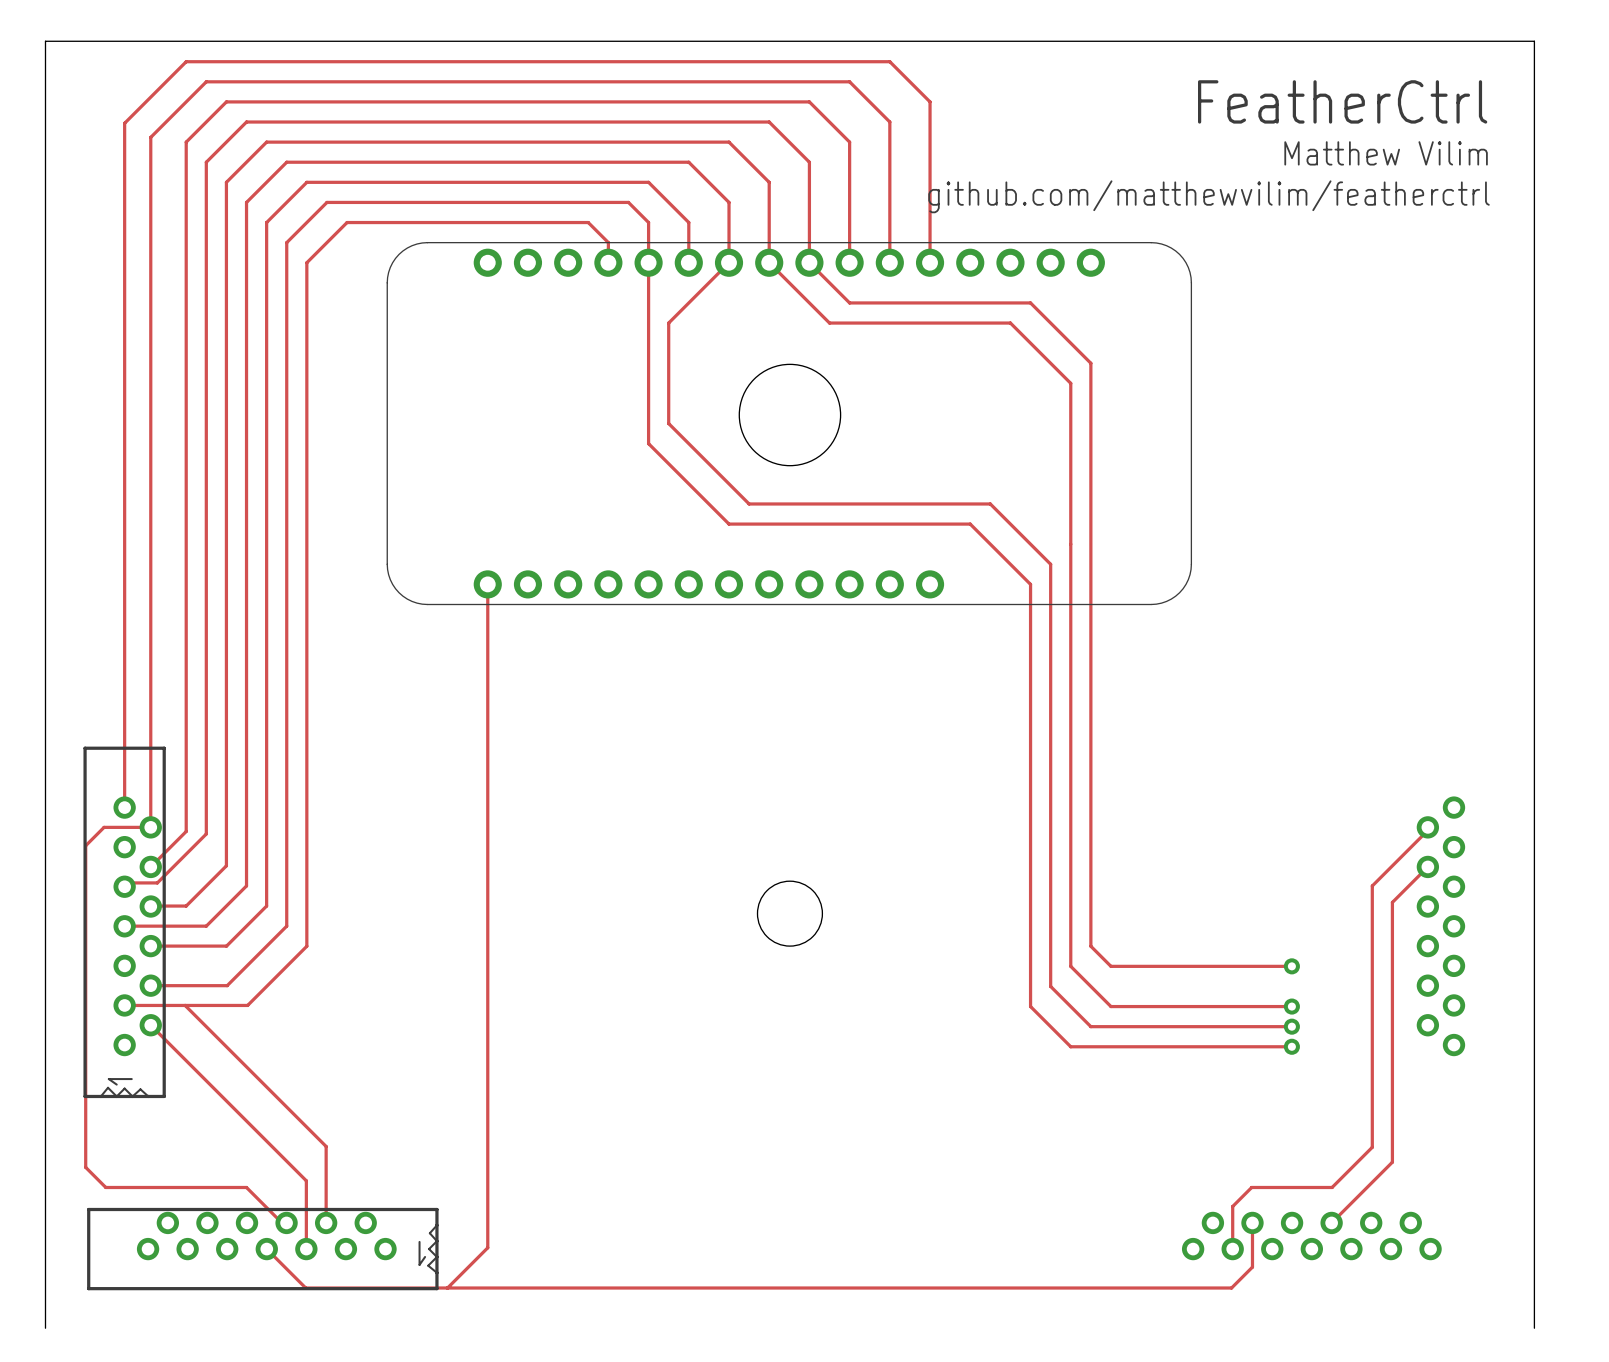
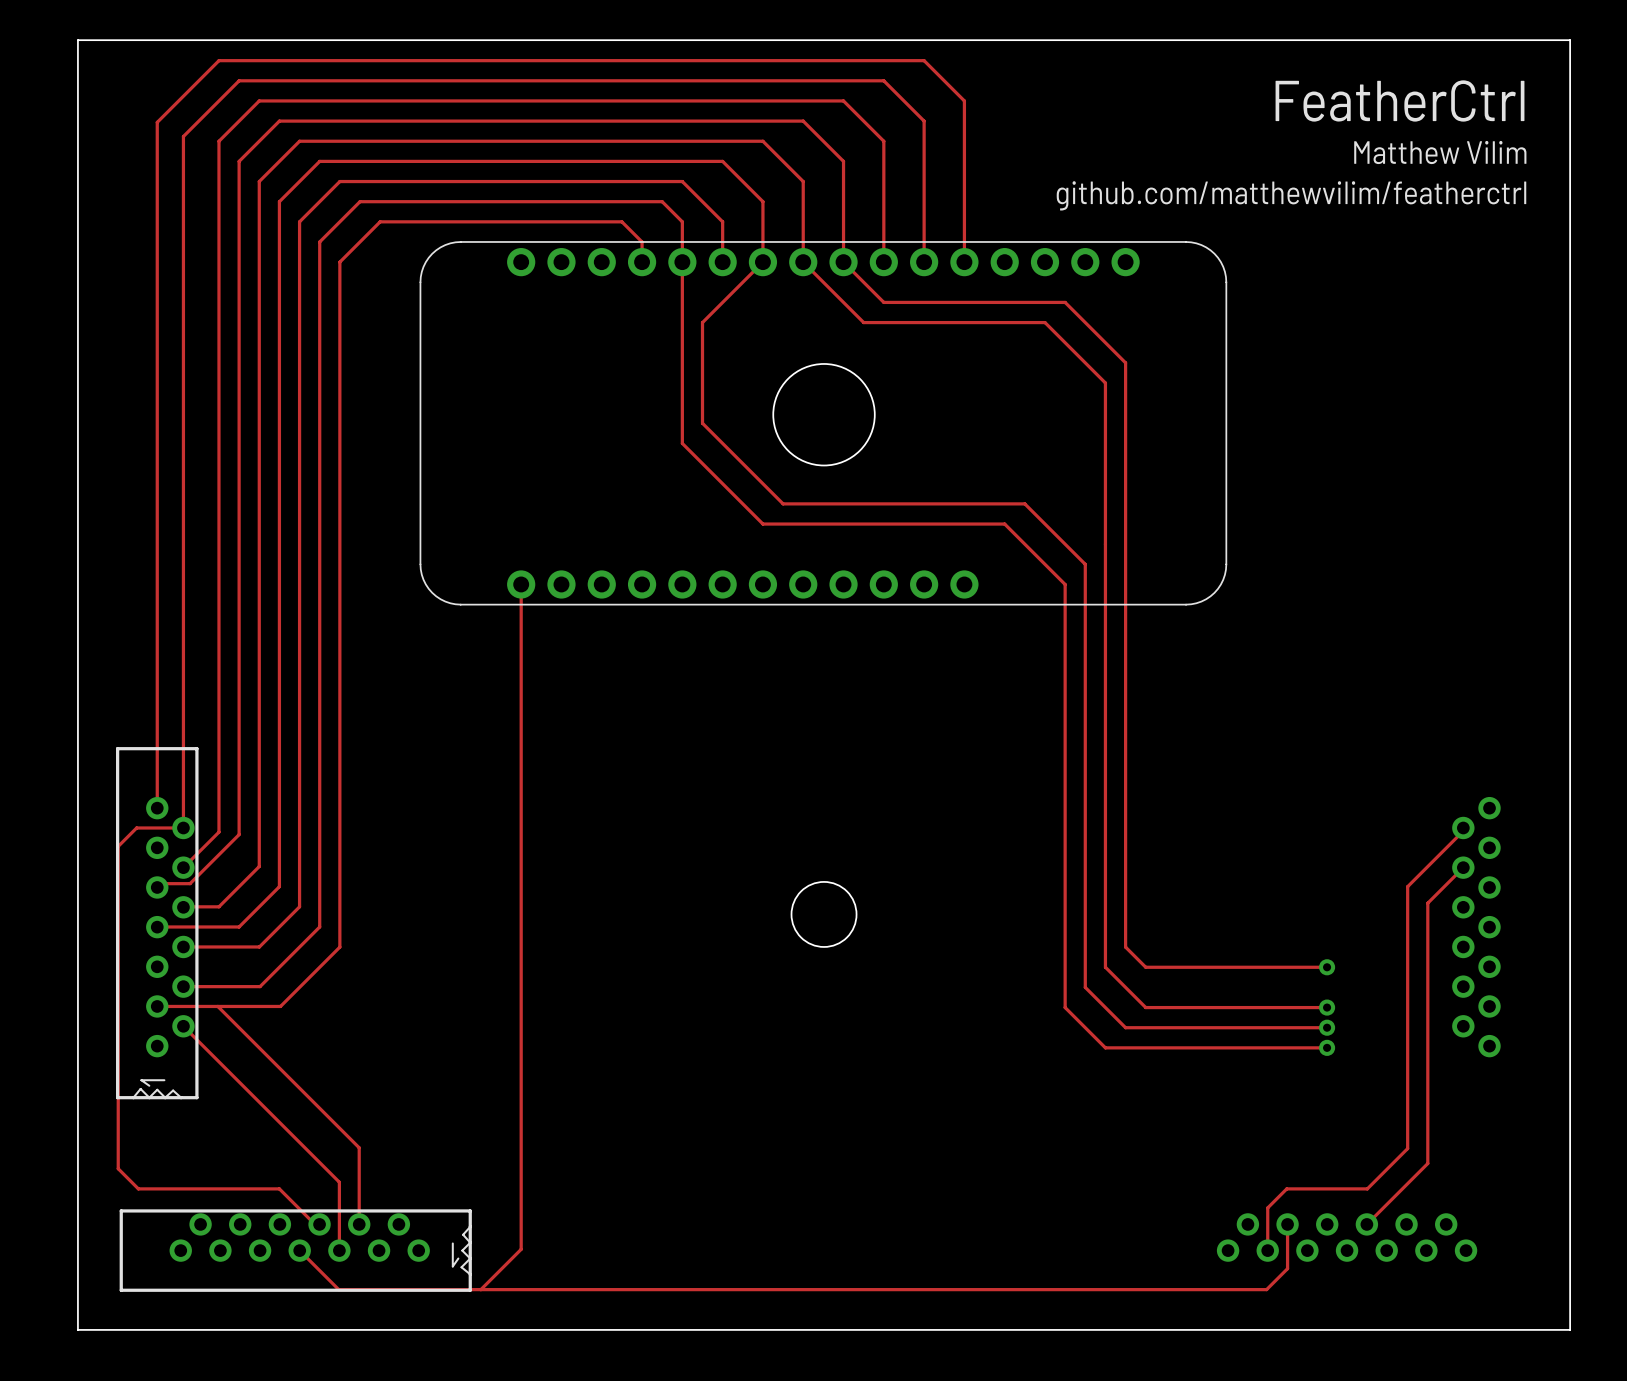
board edge: none -> (77, 1329) (1570, 1329)

